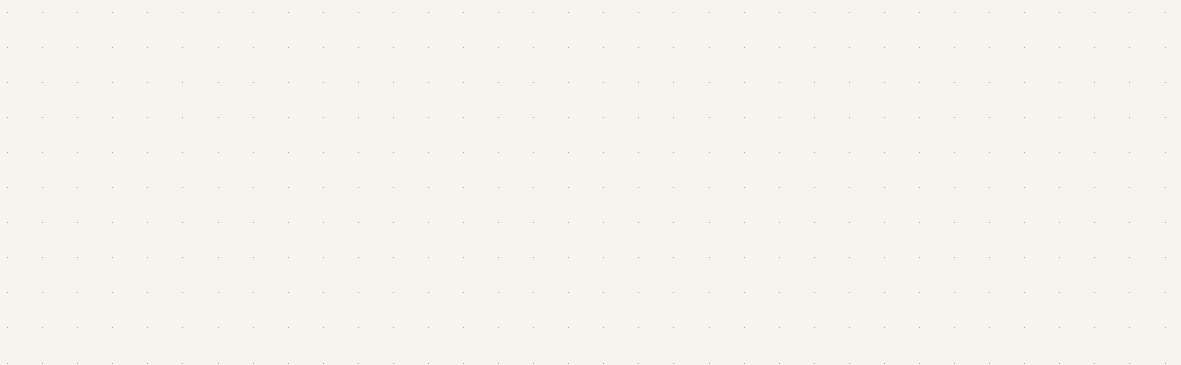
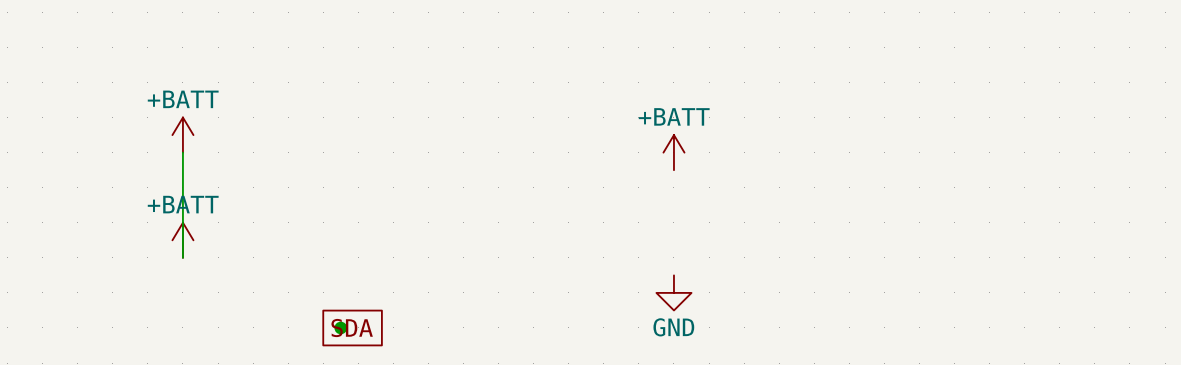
power symbol: none -> +BATT (182, 135)
wire: none -> (182, 152) (182, 257)
power symbol: none -> +BATT (673, 152)
power symbol: none -> +BATT (182, 240)
power symbol: none -> GND (673, 292)
junction: none -> (340, 327)
global label: none -> SDA (352, 328)

